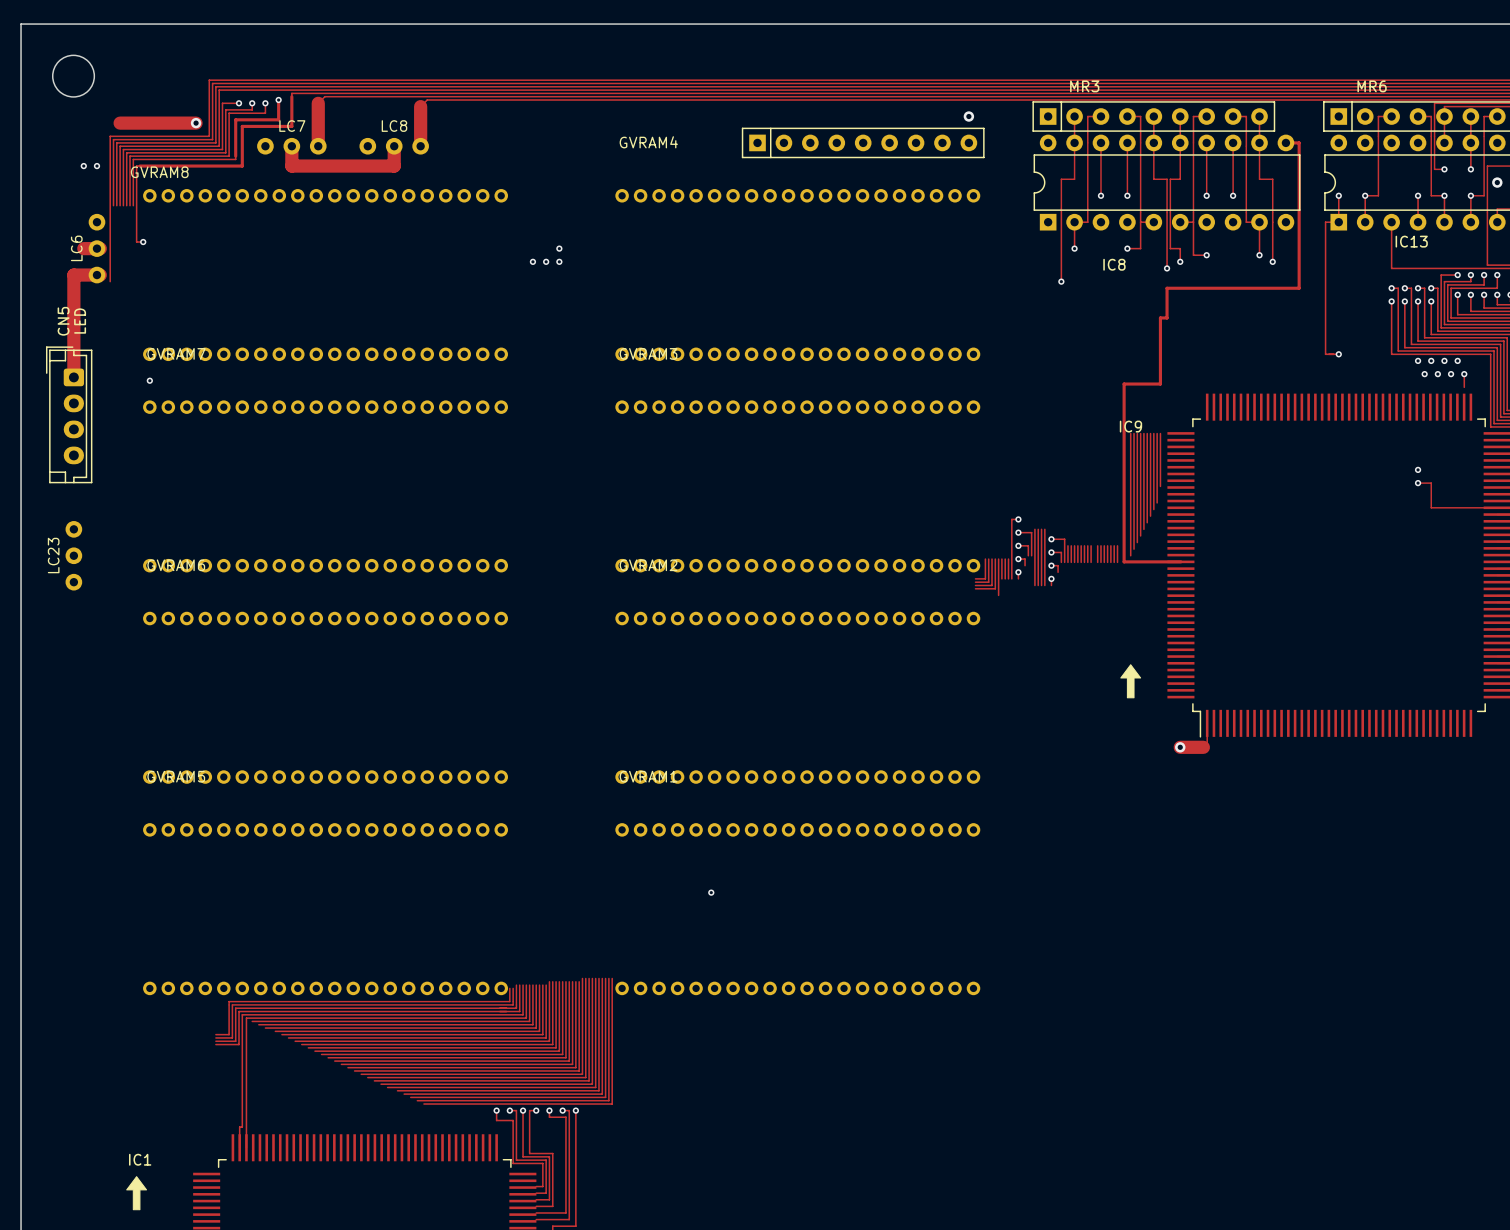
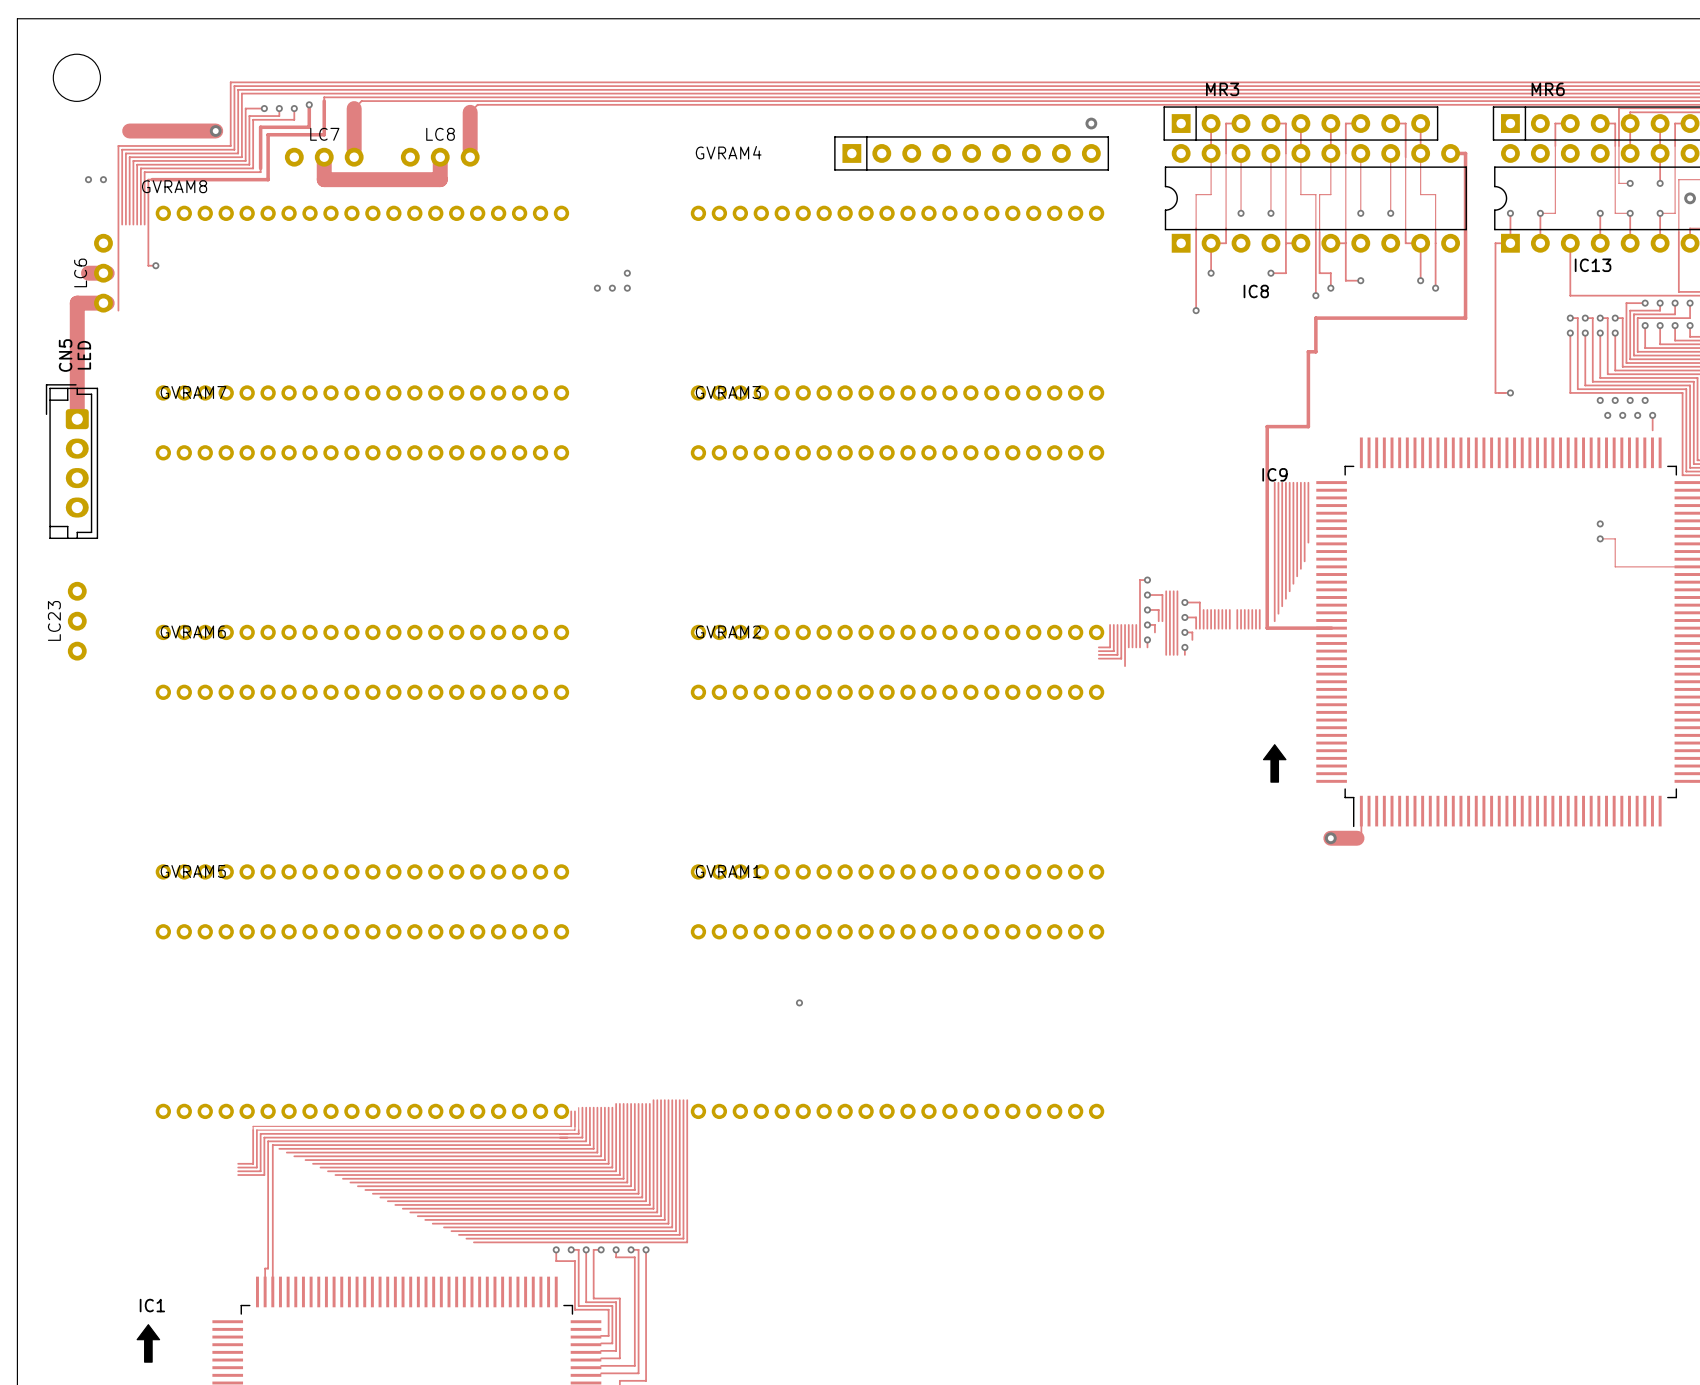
via: (149, 380) -> none

